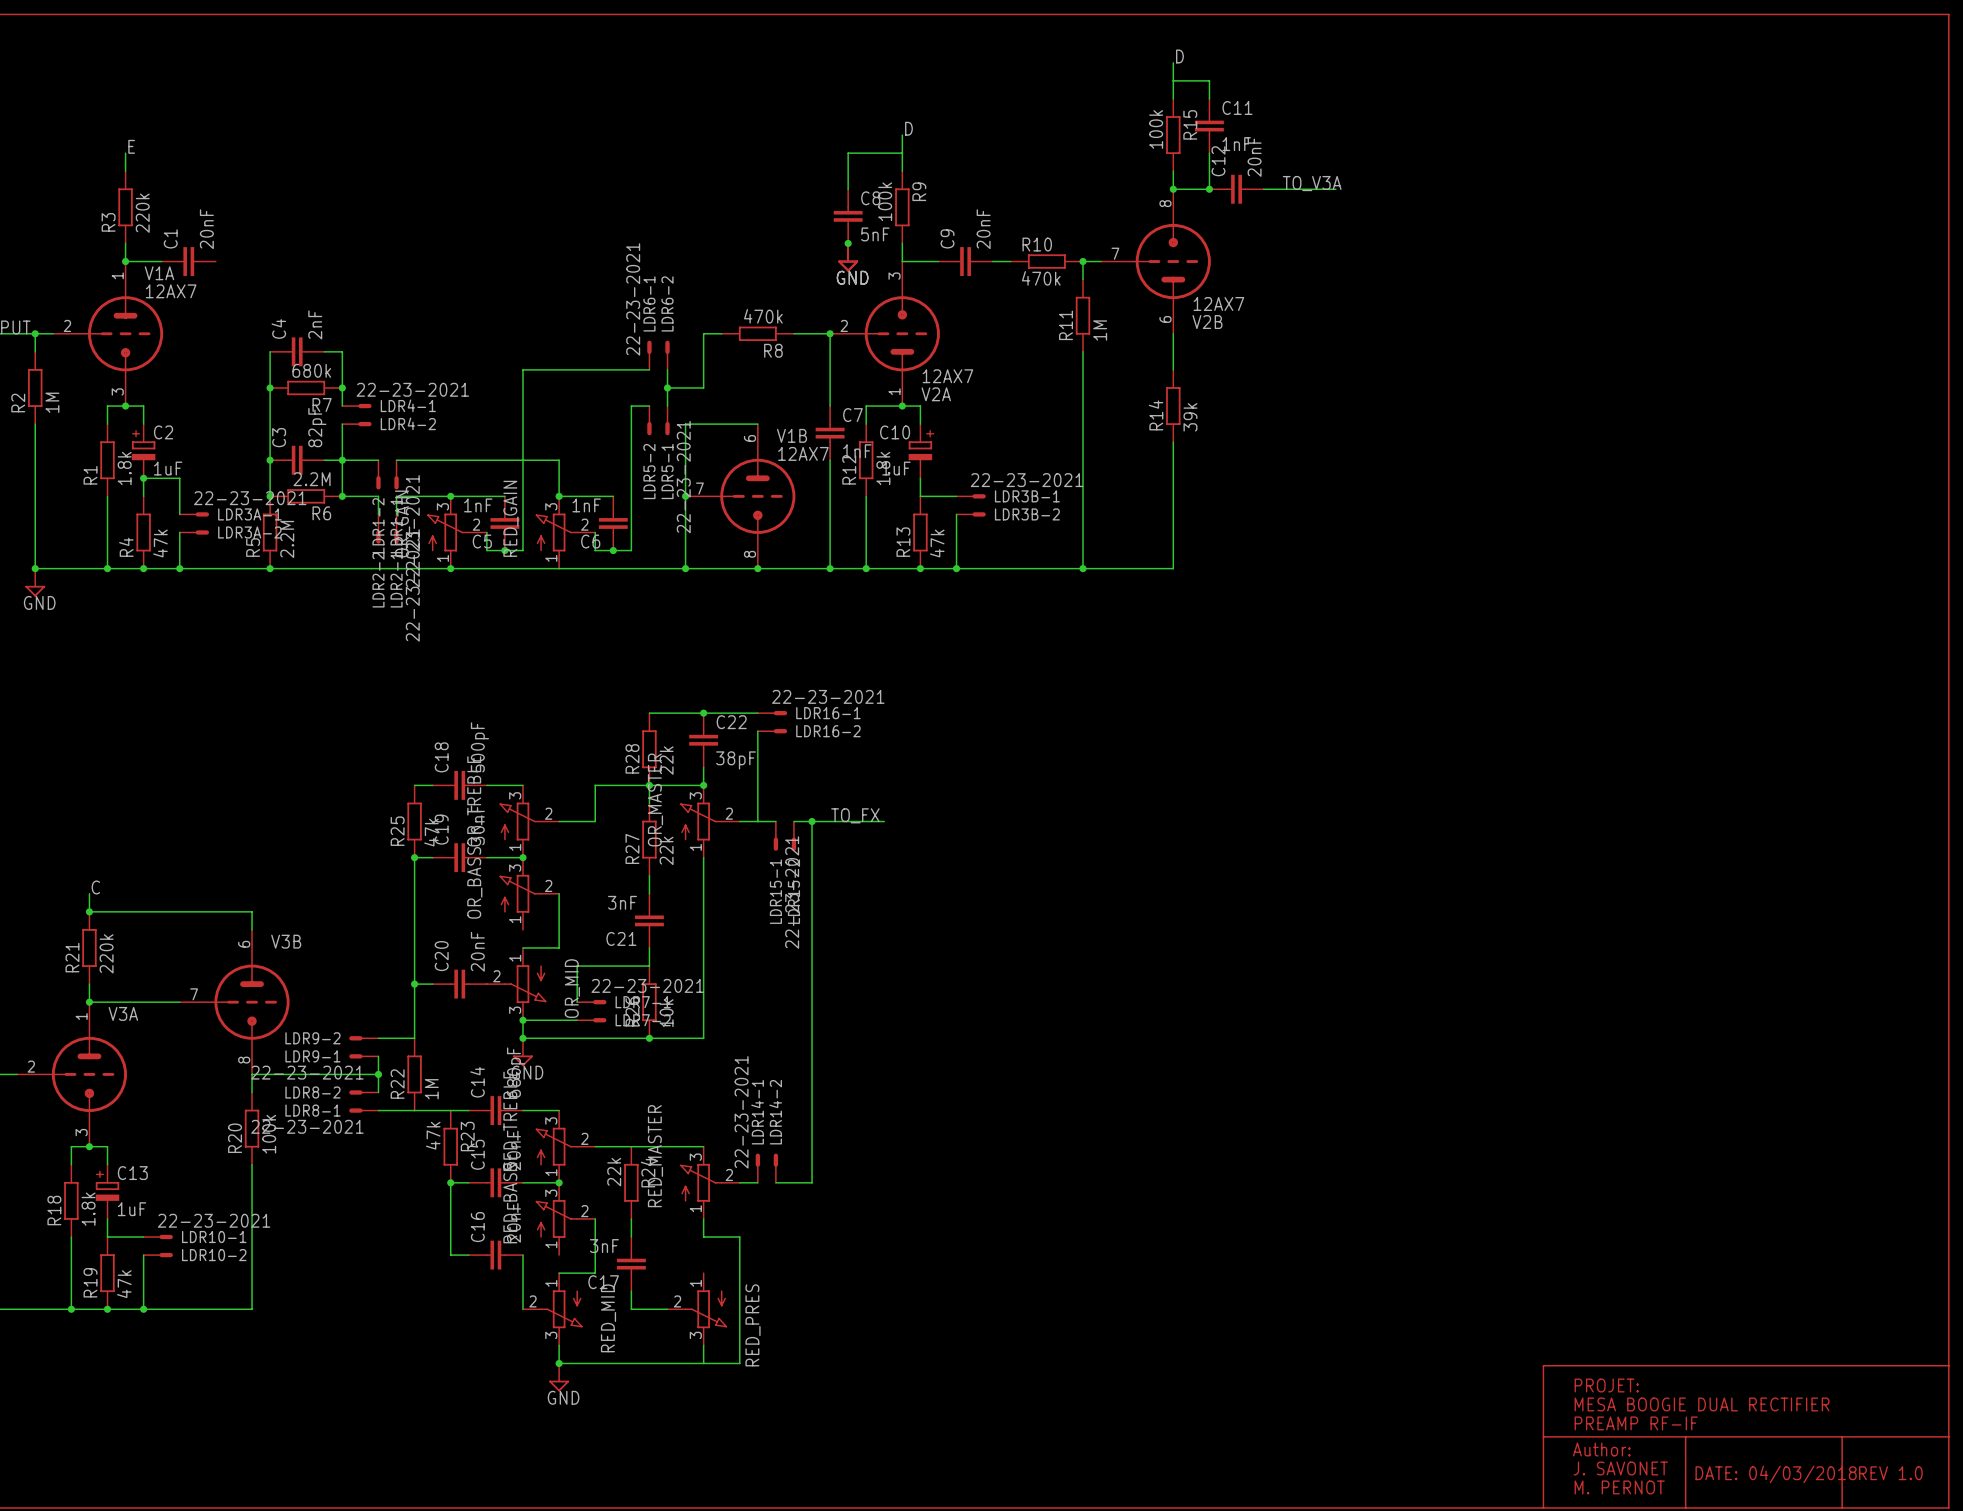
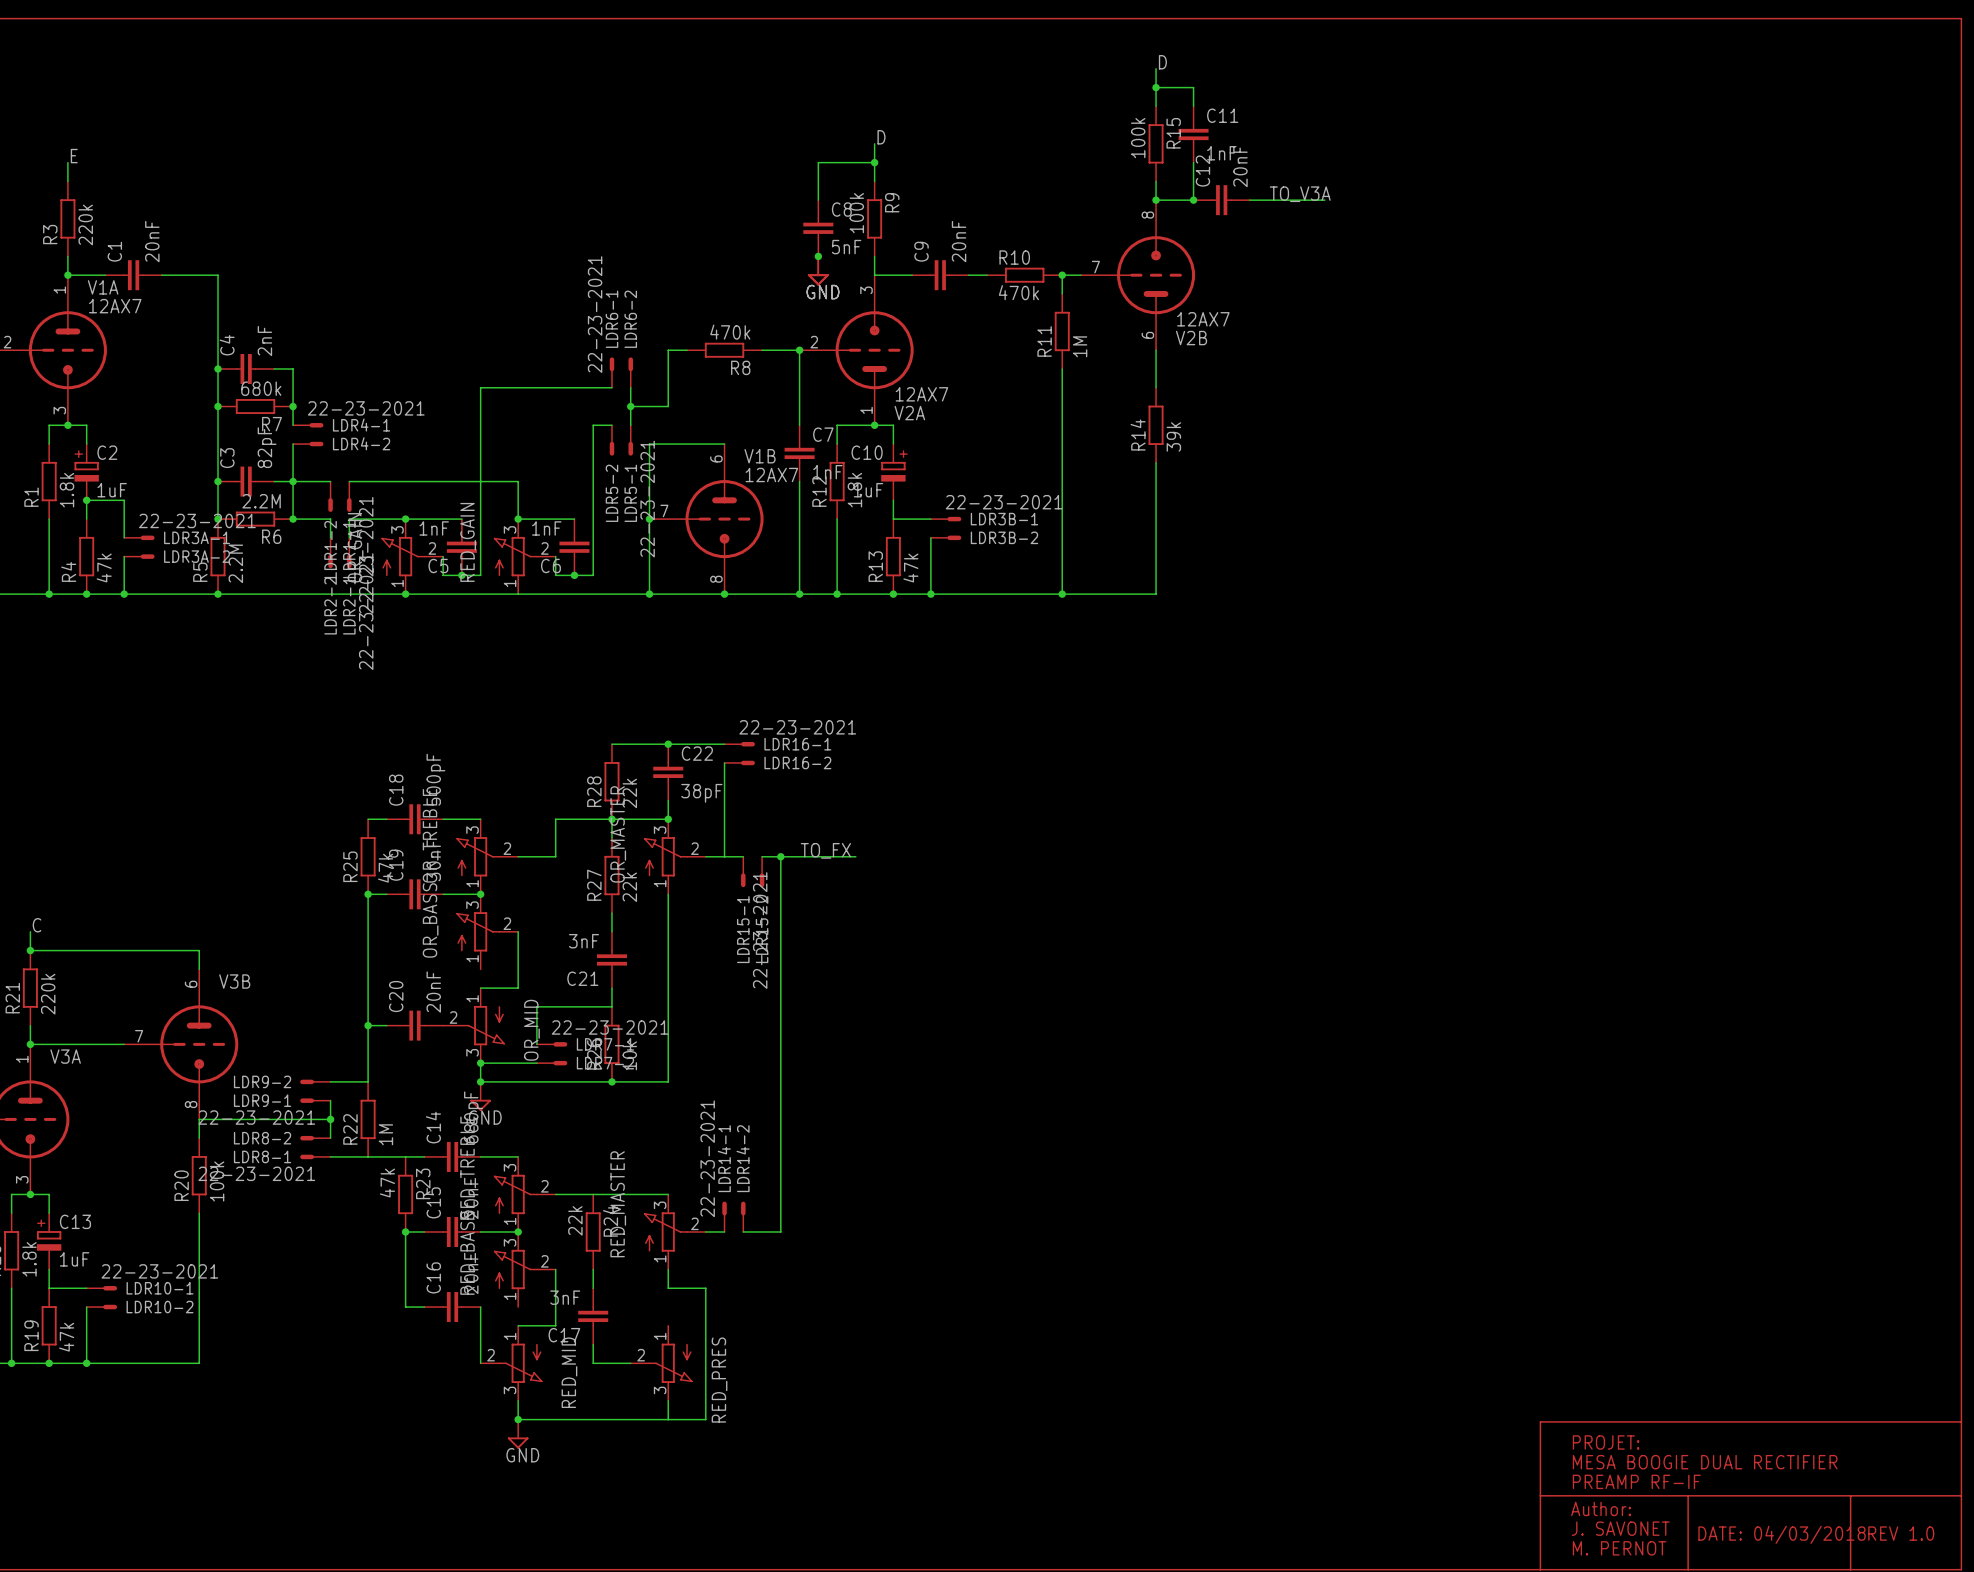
junction: none -> (1156, 87)
junction: none -> (874, 162)
wire: none -> (161, 275) (218, 275) (218, 369)
junction: none -> (218, 369)

